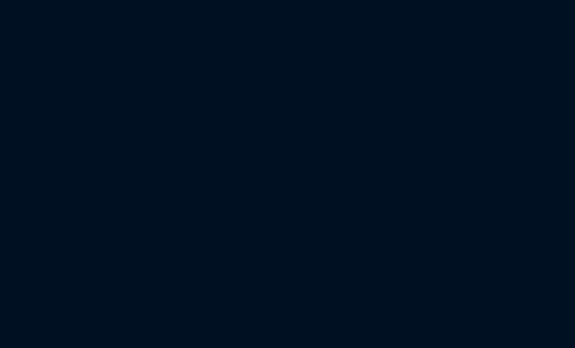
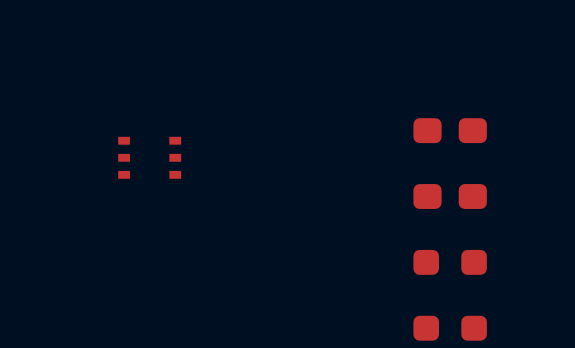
part: none -> (450, 130)
part: none -> (149, 157)
part: none -> (450, 196)
part: none -> (450, 262)
part: none -> (450, 328)

